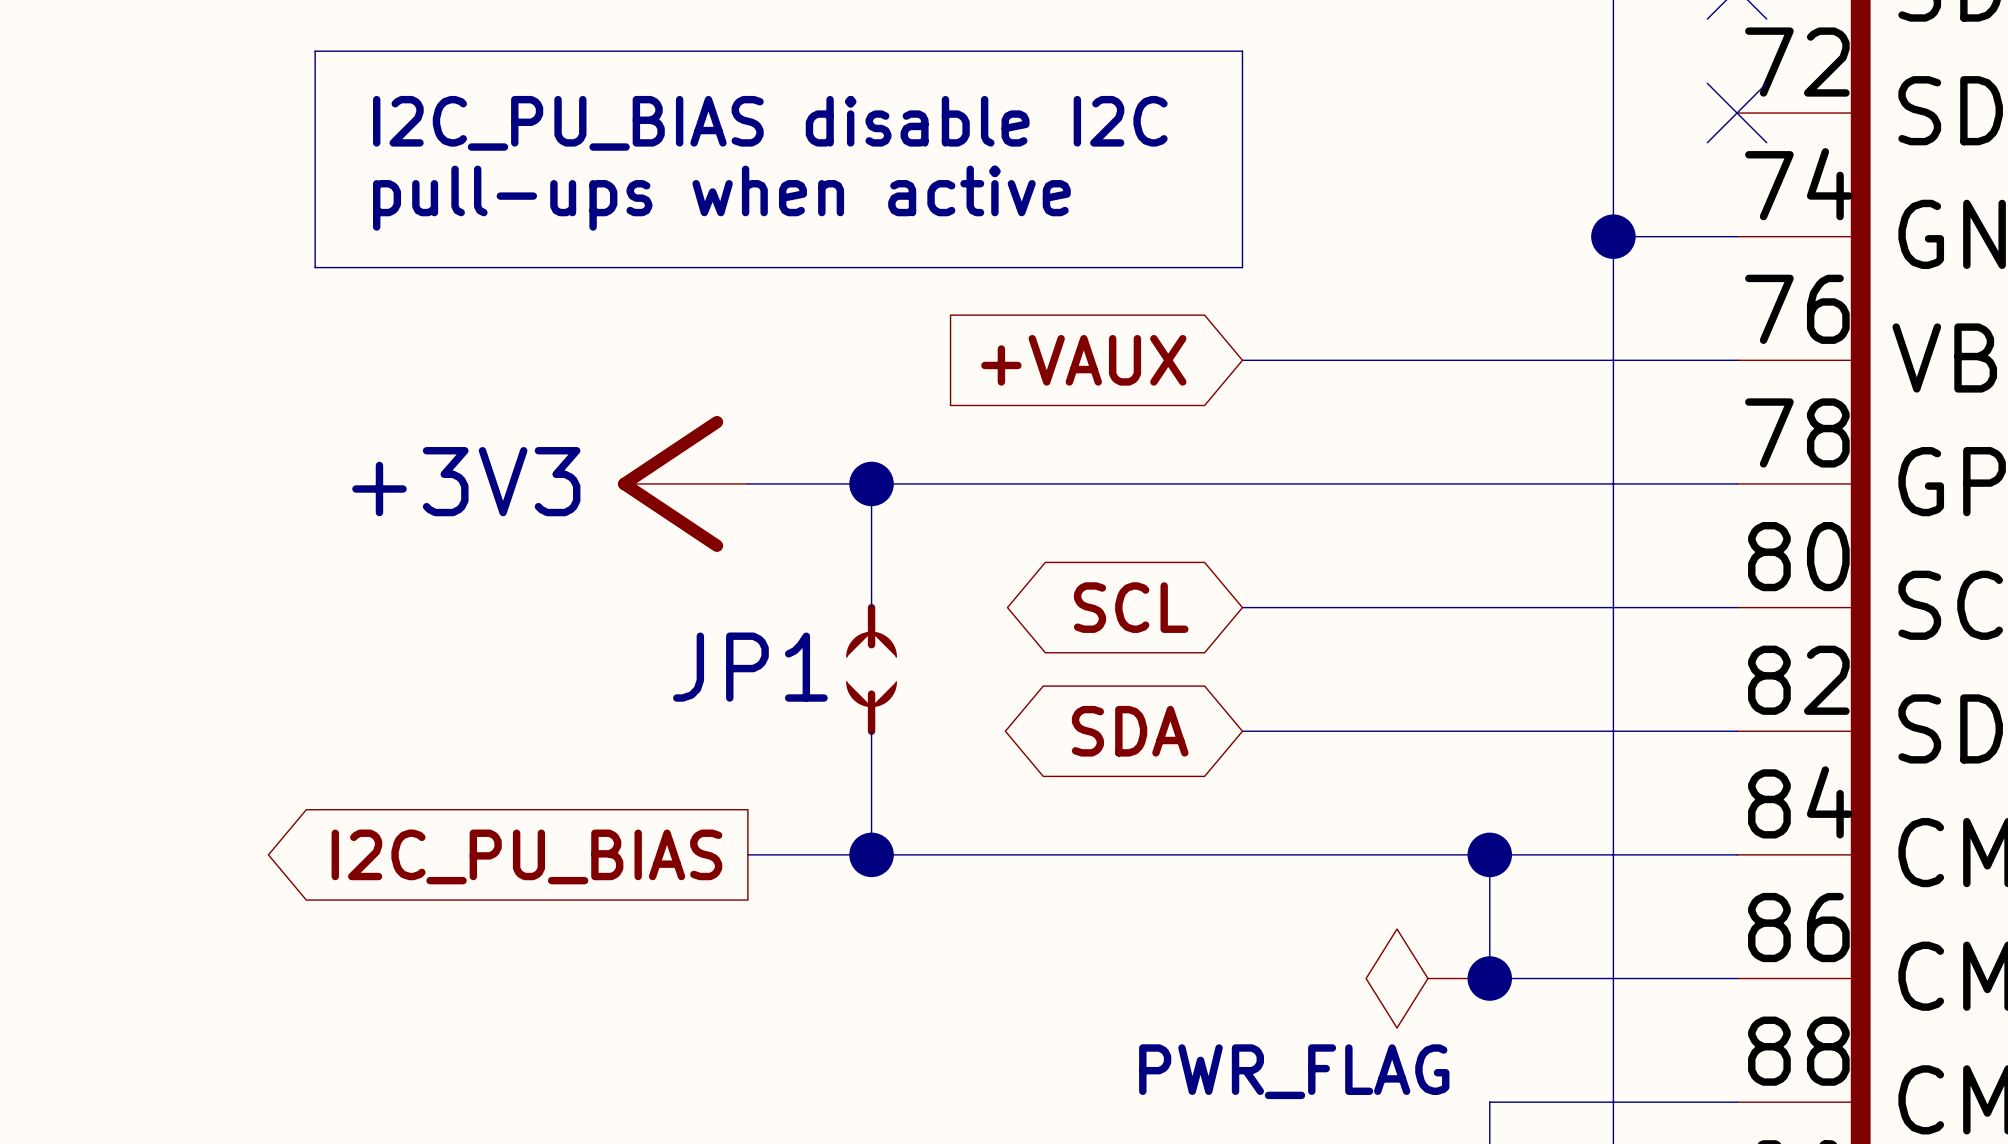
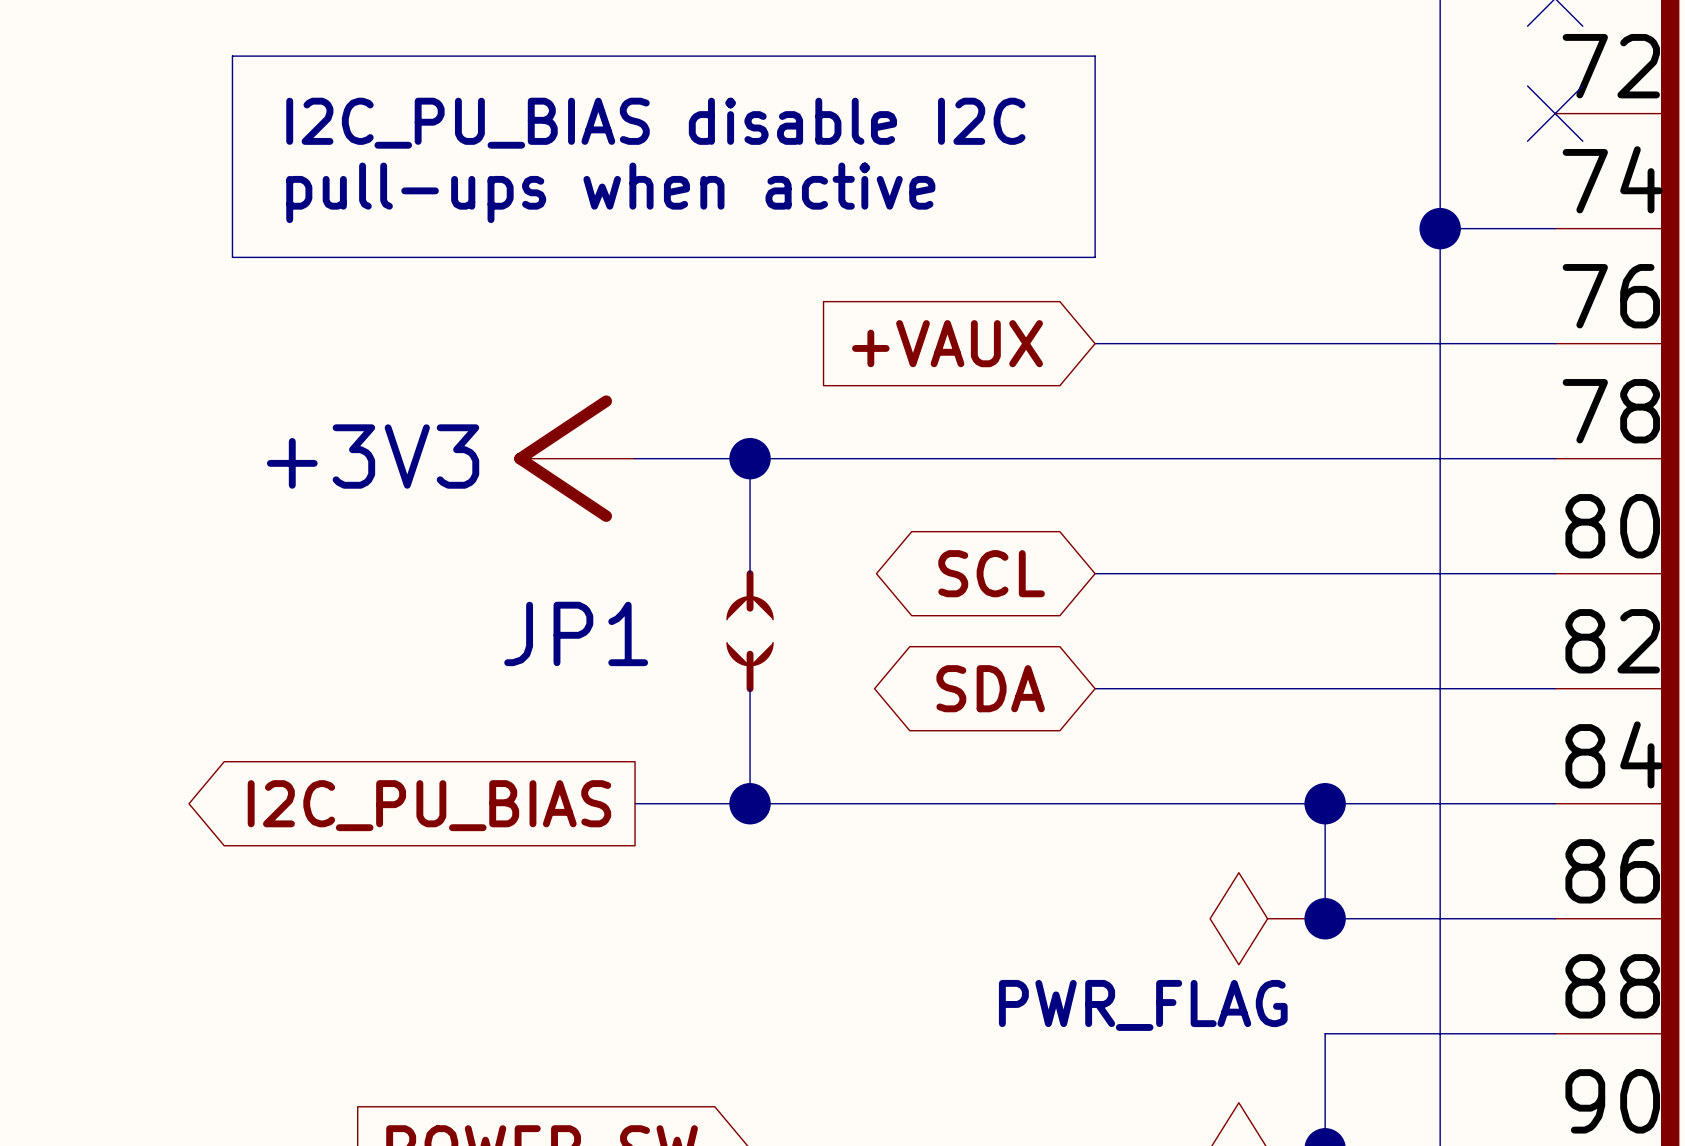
JP1 name position: JP1 (750, 667) -> JP1 (576, 633)

